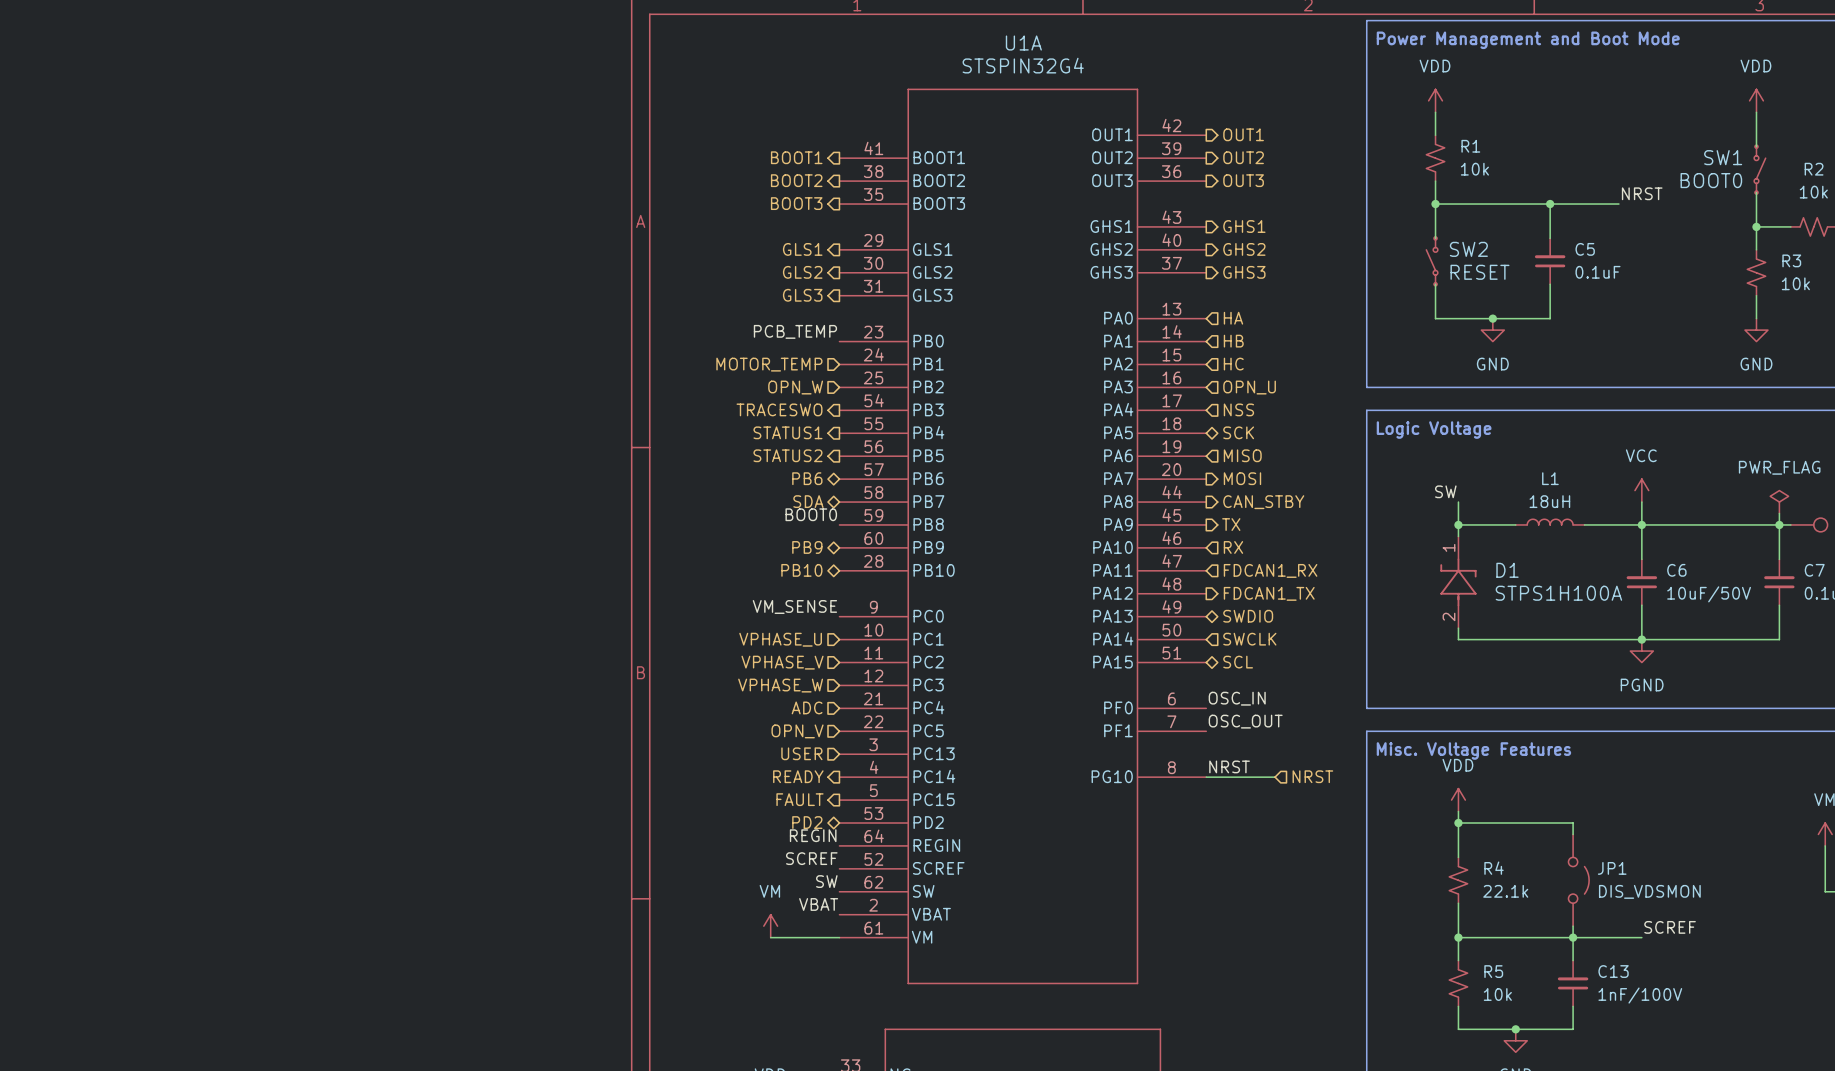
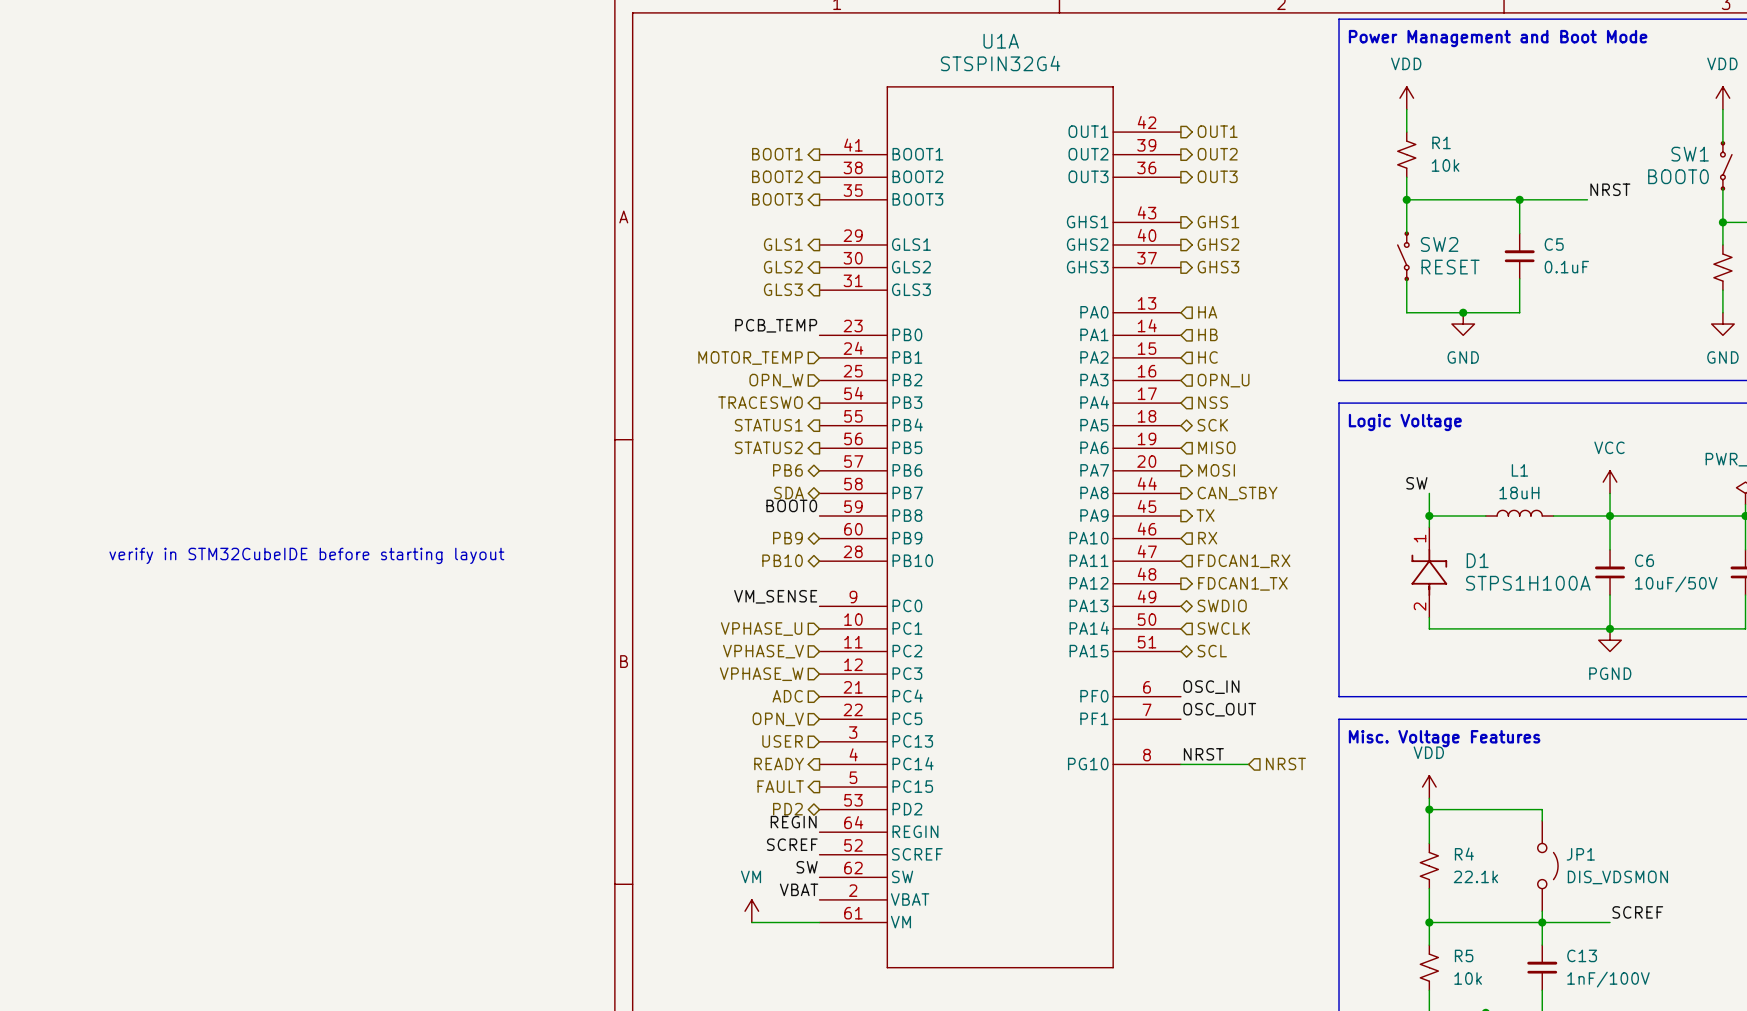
text: none -> verify in STM32CubeIDE before starting layout (306, 555)

